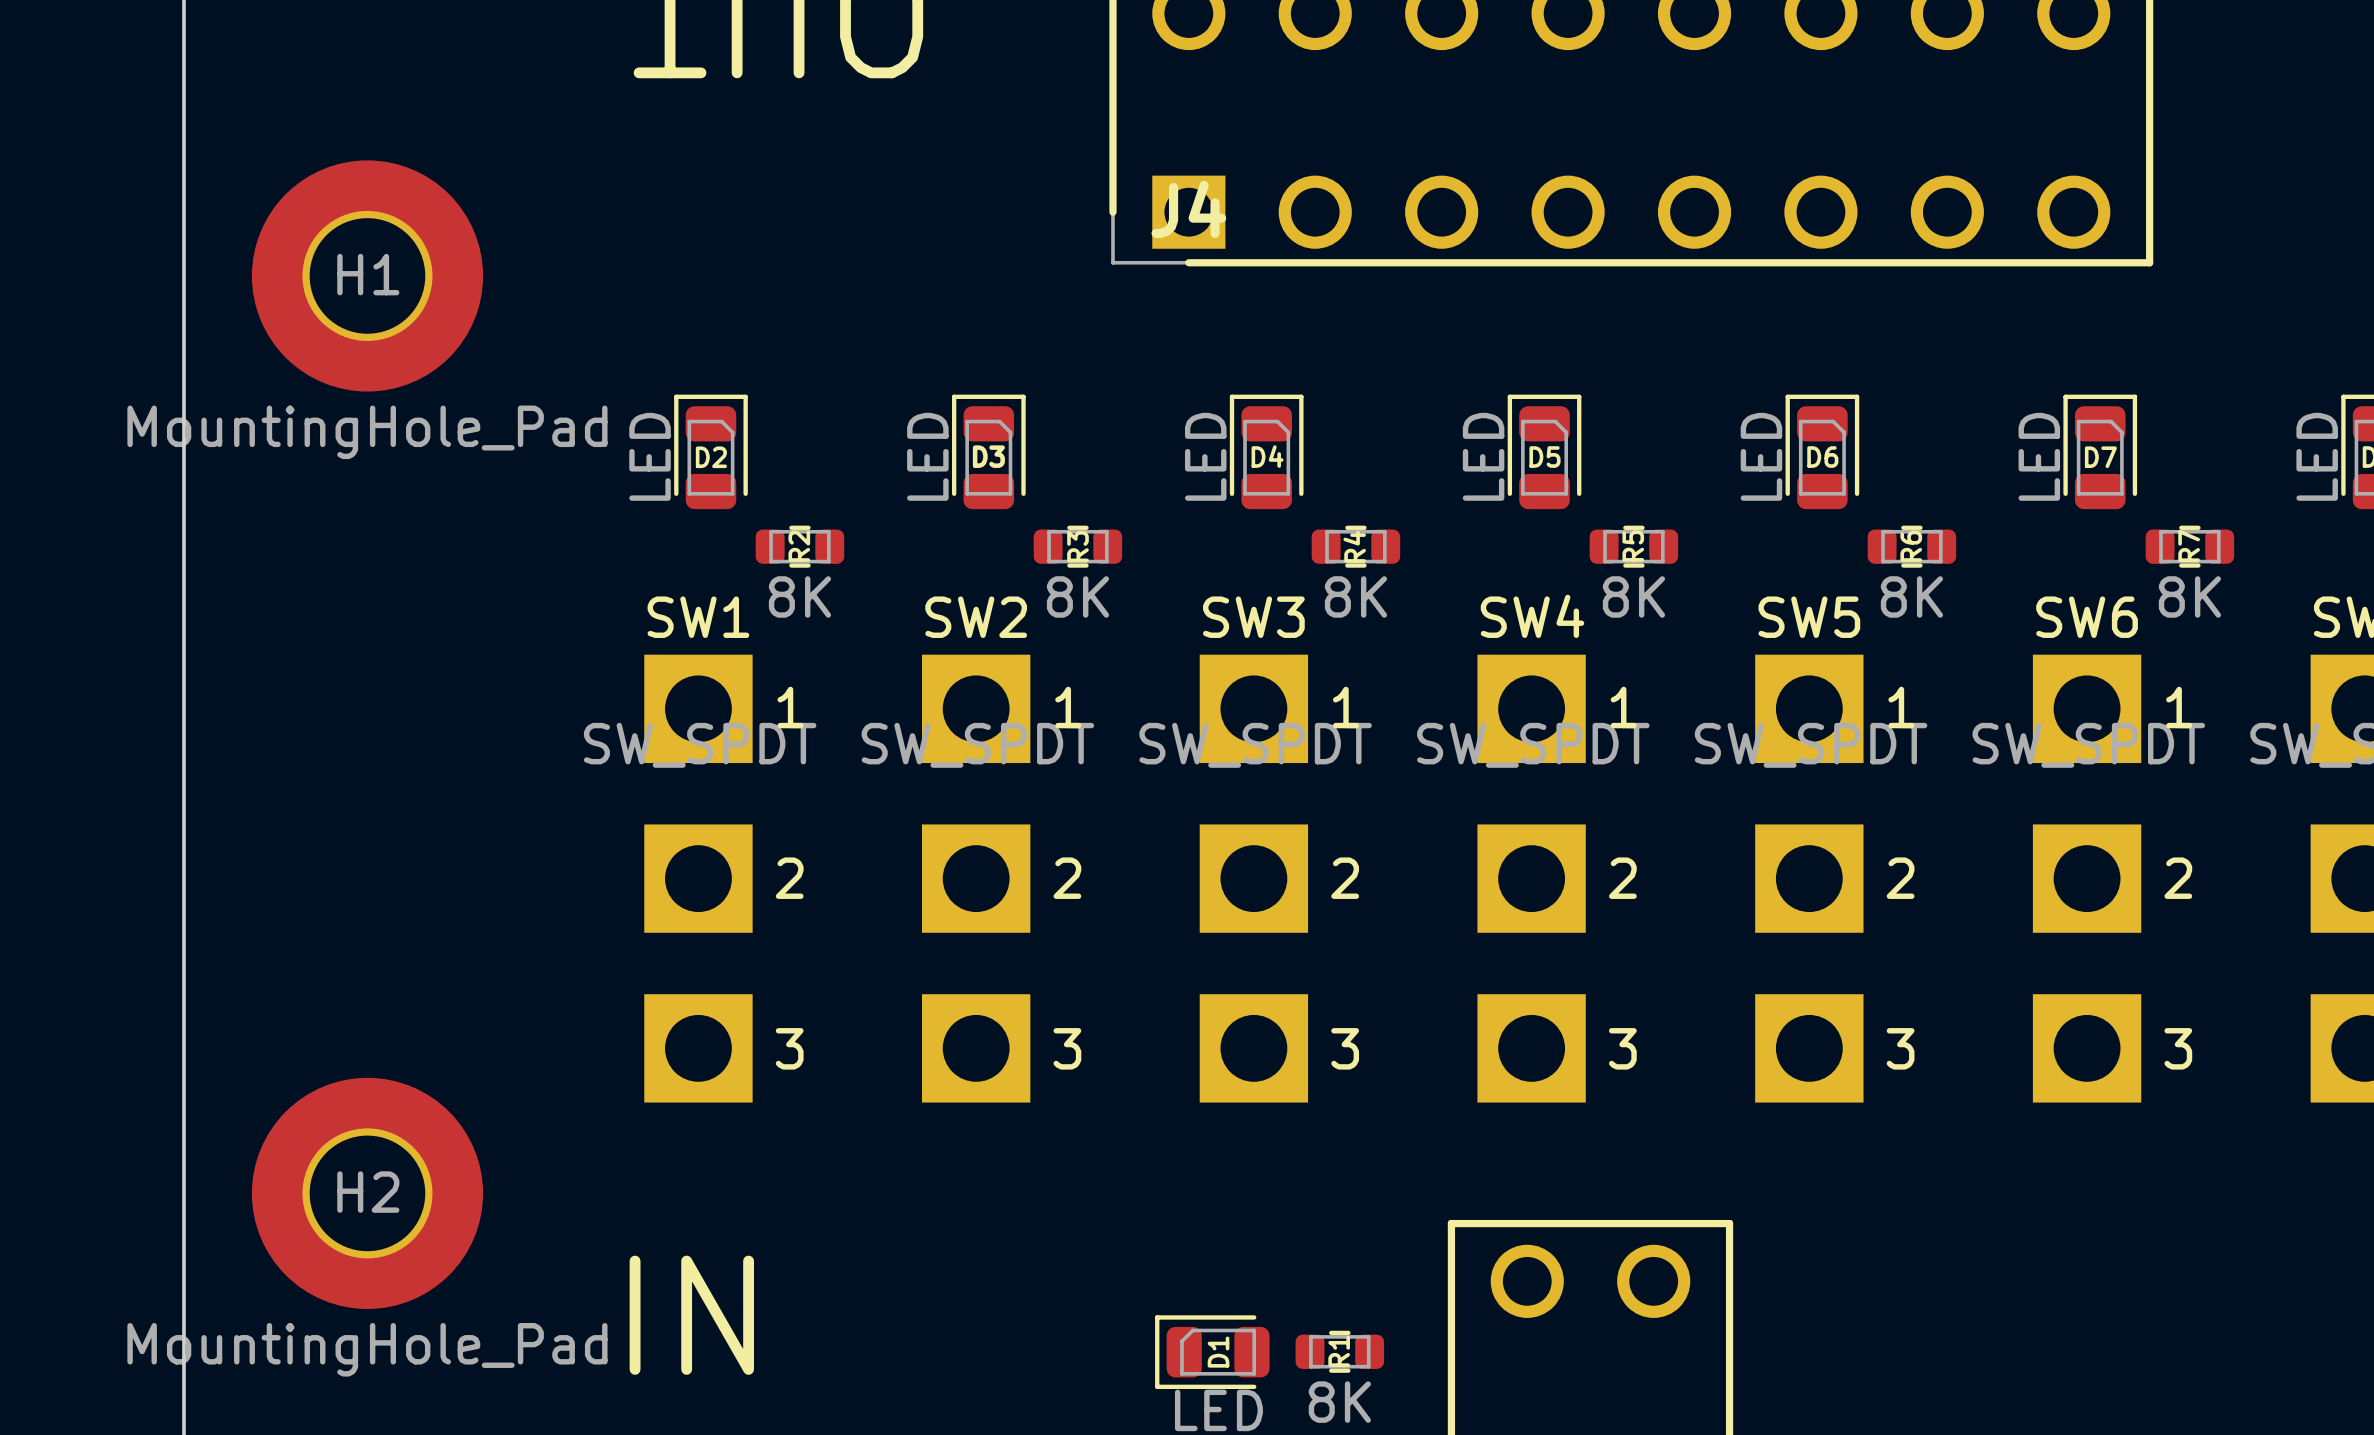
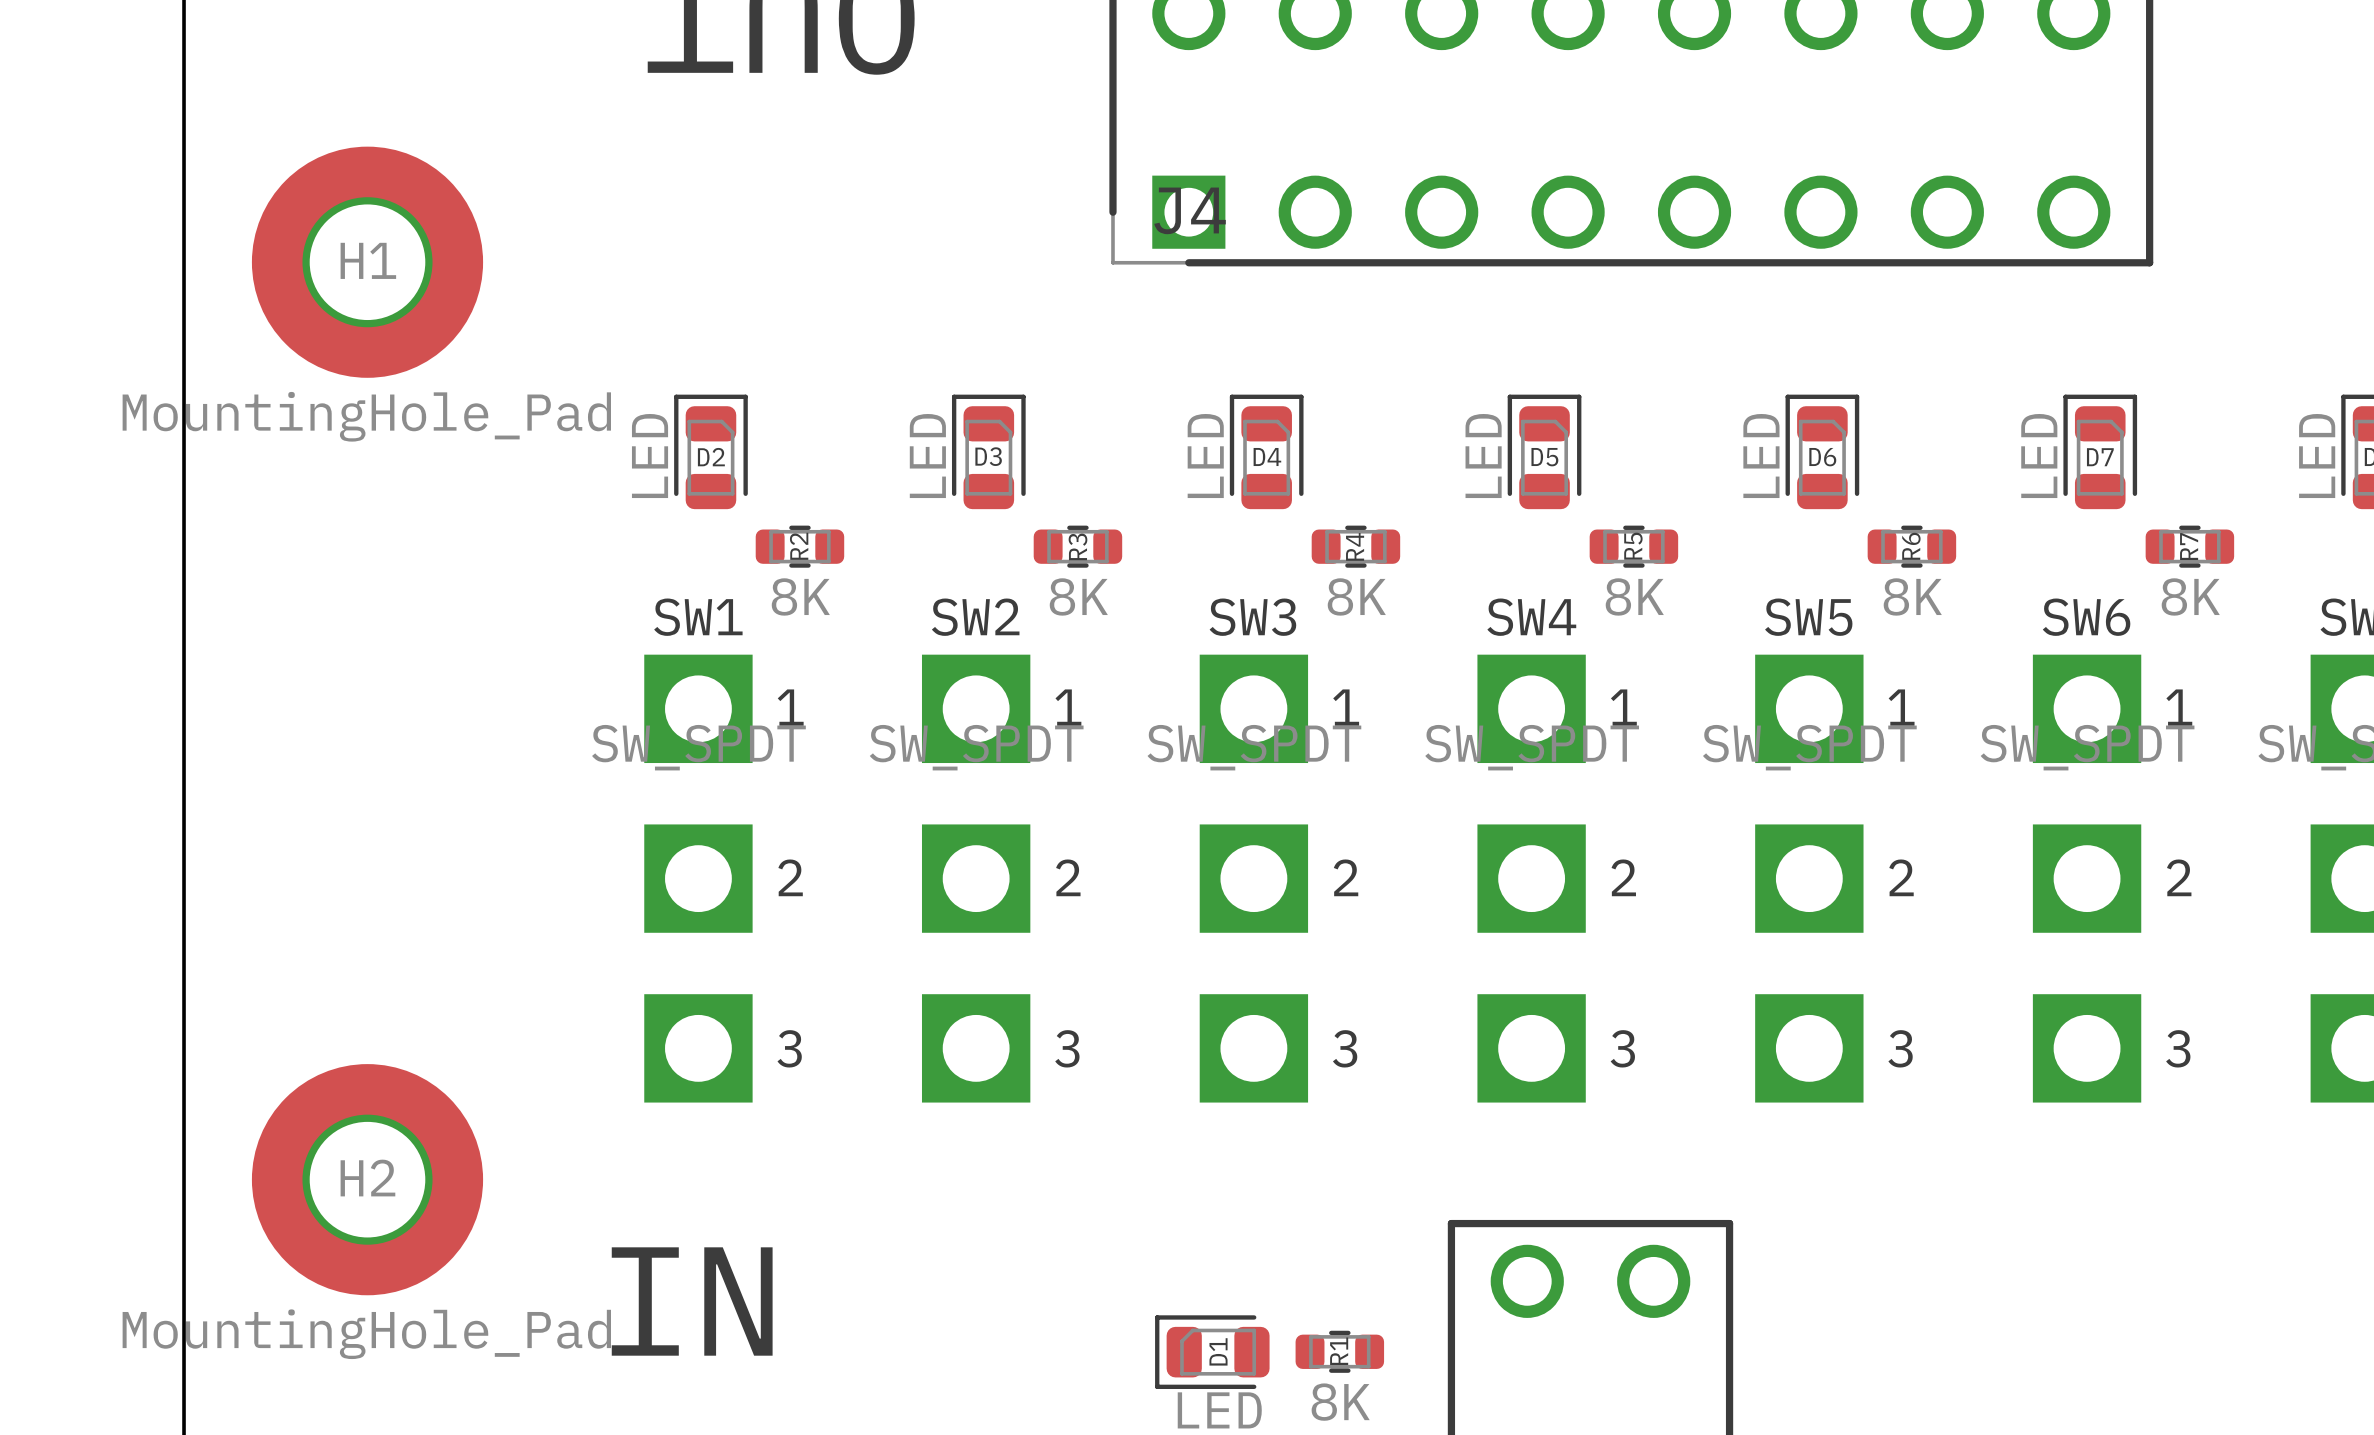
H1 position: (367, 275) -> (367, 262)
H2 position: (367, 1193) -> (367, 1179)
text position: IN (691, 1315) -> IN (692, 1301)

